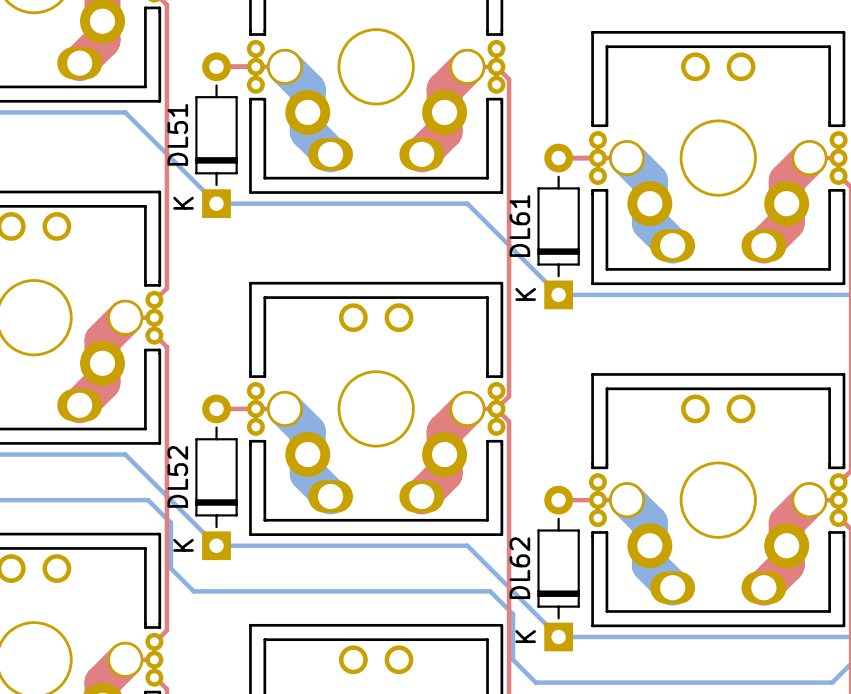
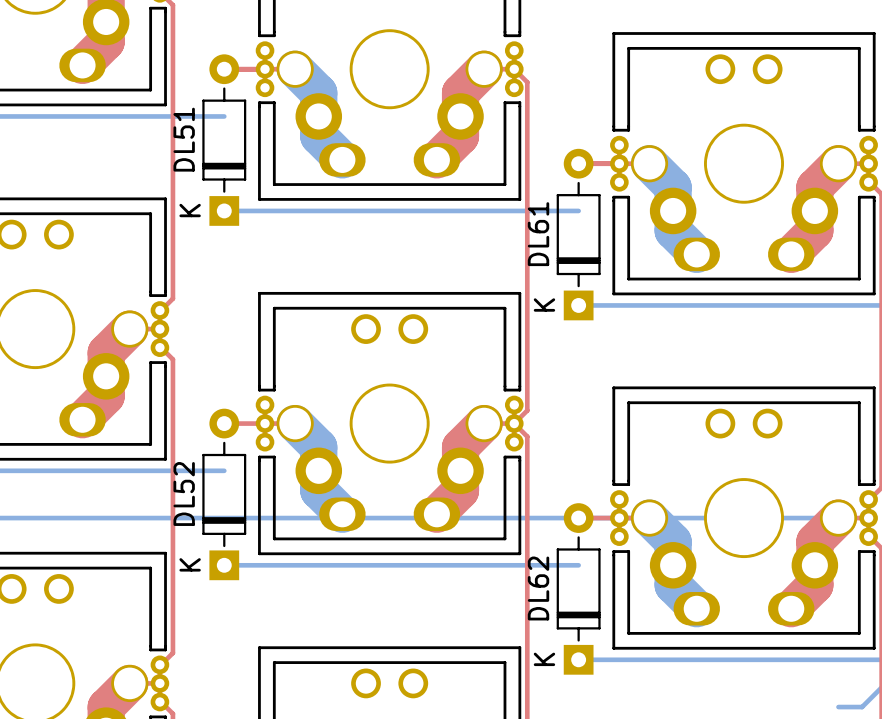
bottom track: (125, 112) (216, 203) -> (129, 116) (224, 116)
bottom track: (467, 203) (558, 294) -> (484, 210) (578, 210)
bottom track: (125, 454) (216, 545) -> (129, 470) (224, 470)
bottom track: (148, 500) (170, 522) (170, 568) (193, 591) (490, 591) (513, 614) (513, 659) (535, 682) (809, 682) -> (153, 518) (849, 518)
bottom track: (467, 545) (558, 636) -> (484, 565) (578, 565)

